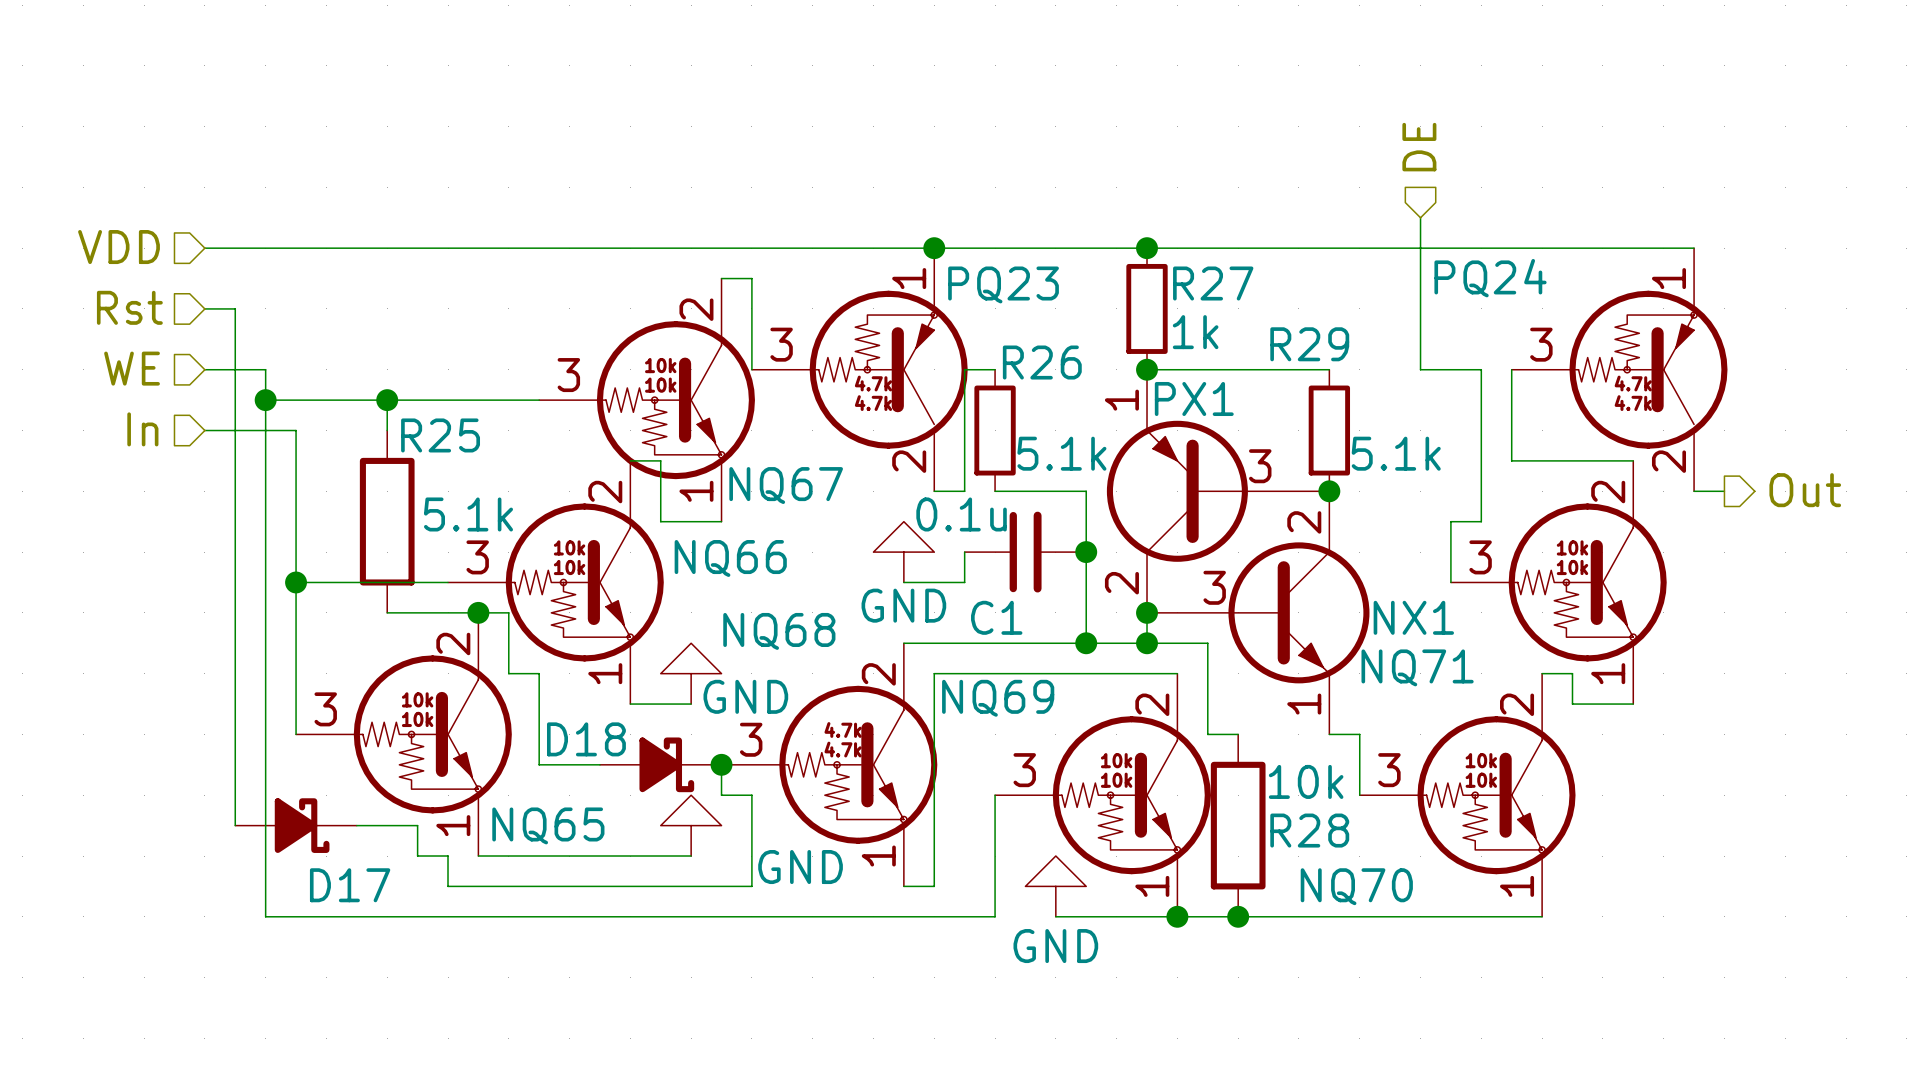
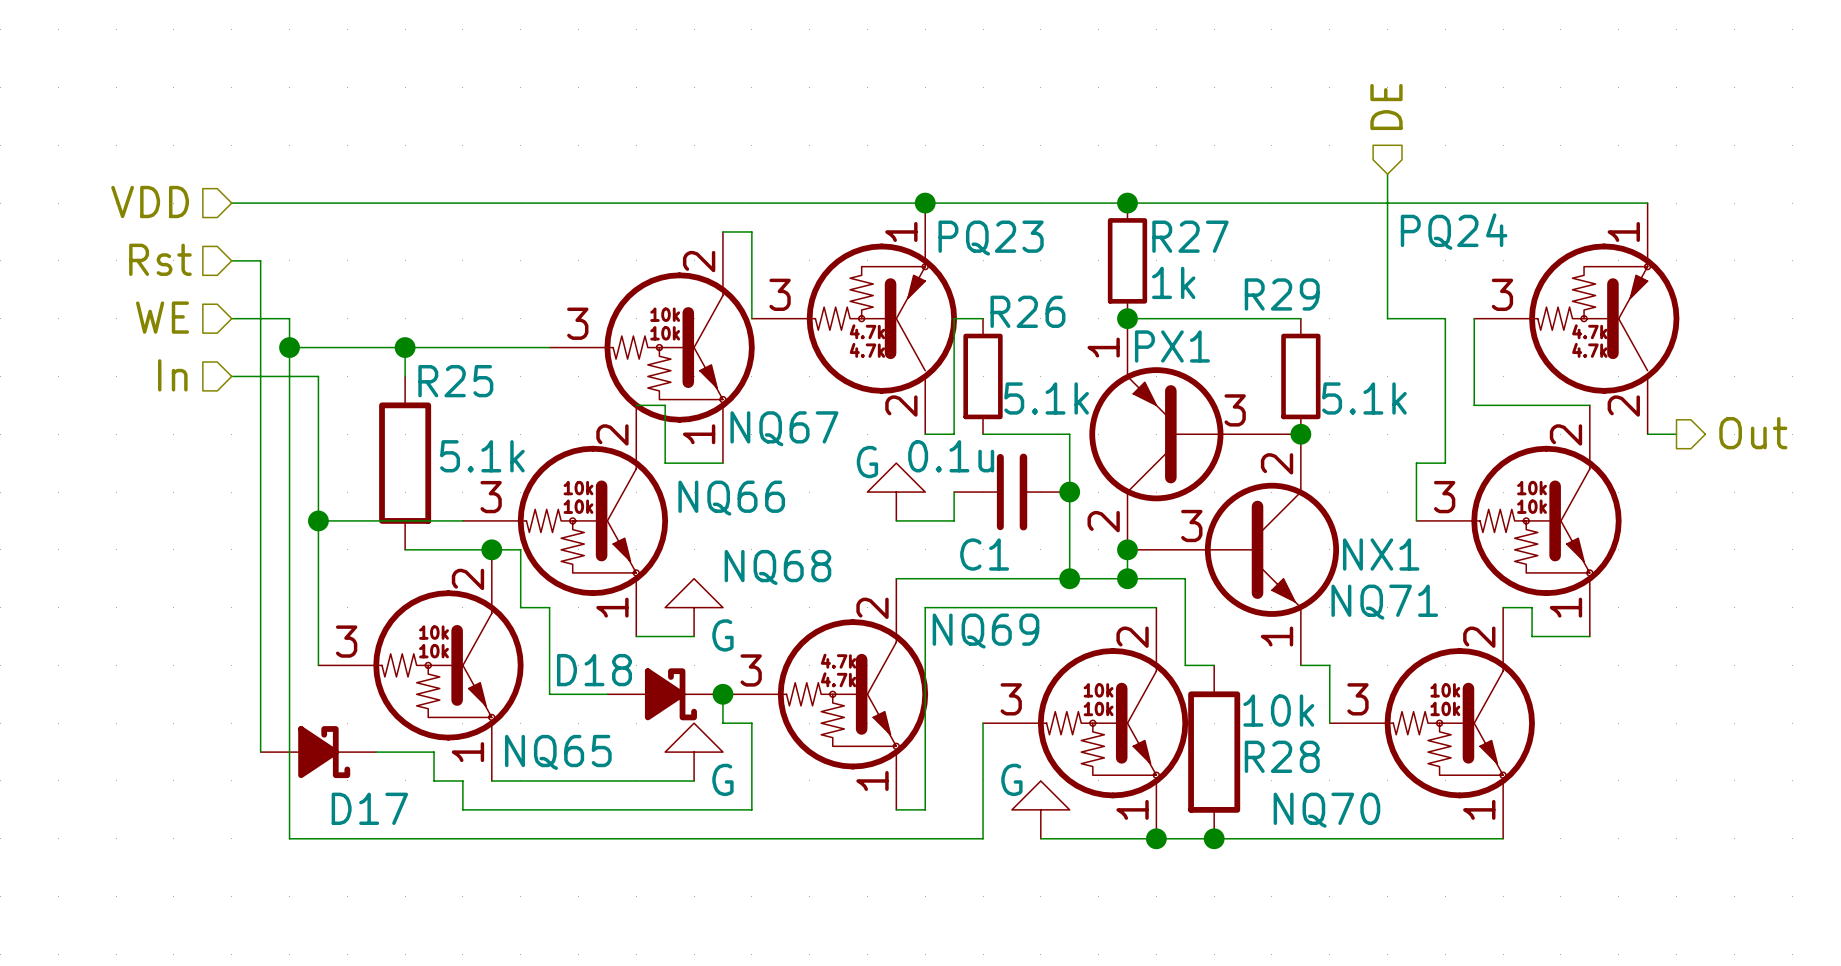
power symbol: GND (903, 552) -> G (896, 492)
power symbol: GND (691, 673) -> G (694, 607)
power symbol: GND (691, 825) -> G (694, 752)
power symbol: GND (1055, 886) -> G (1040, 809)

